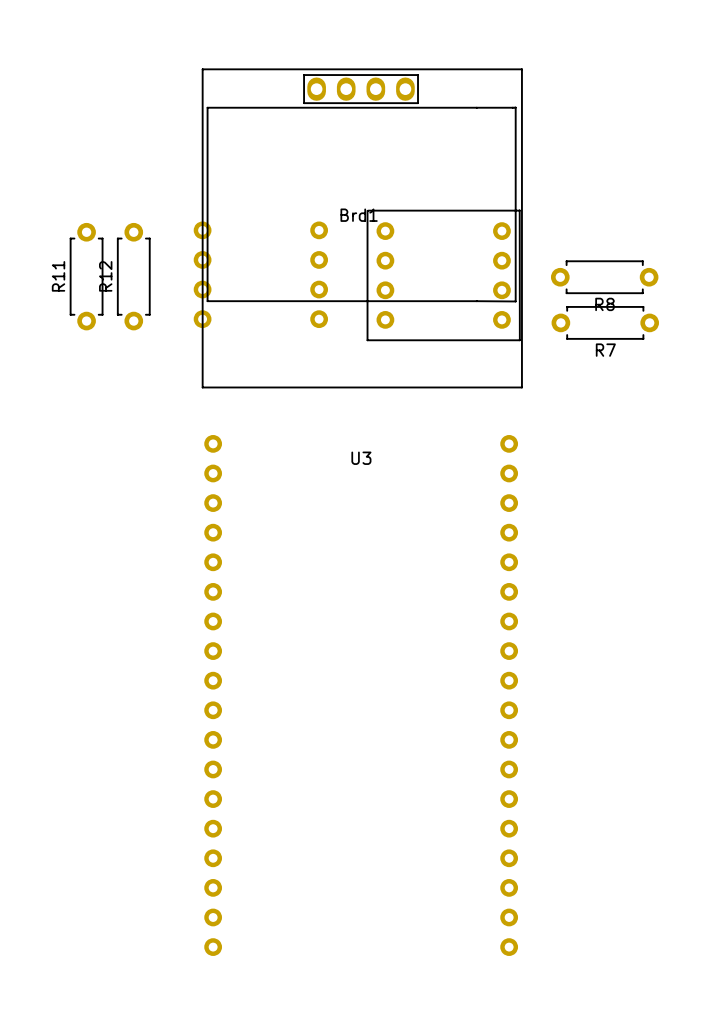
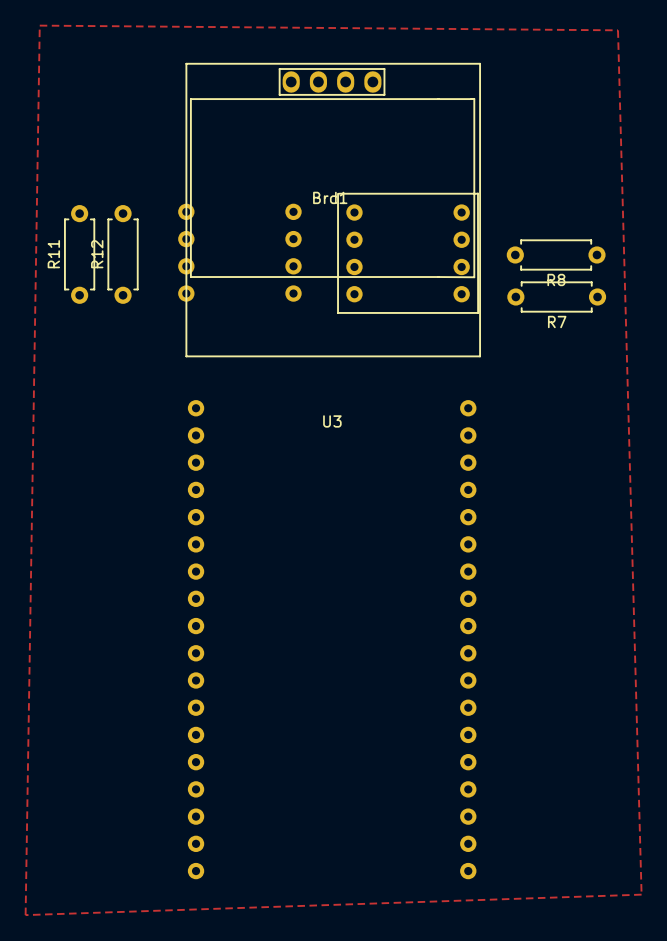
zone outline: none -> (39, 25) (618, 30) (641, 894) (25, 915) (39, 25)

